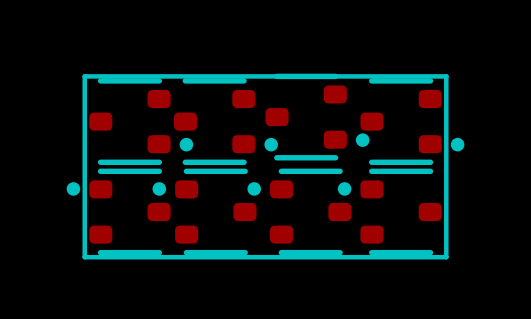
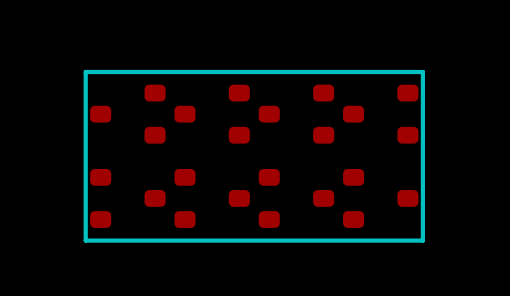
part footprint: [265, 73, 370, 161] -> [258, 84, 335, 144]
part footprint: [89, 78, 194, 165] -> [90, 84, 166, 144]
part footprint: [174, 78, 278, 165] -> [174, 84, 250, 144]
part footprint: [360, 78, 465, 165] -> [343, 84, 419, 144]
part footprint: [66, 168, 171, 256] -> [90, 168, 166, 228]
part footprint: [152, 168, 257, 256] -> [174, 168, 250, 228]
part footprint: [247, 168, 352, 256] -> [258, 168, 335, 228]
part footprint: [337, 168, 442, 256] -> [343, 168, 419, 228]

